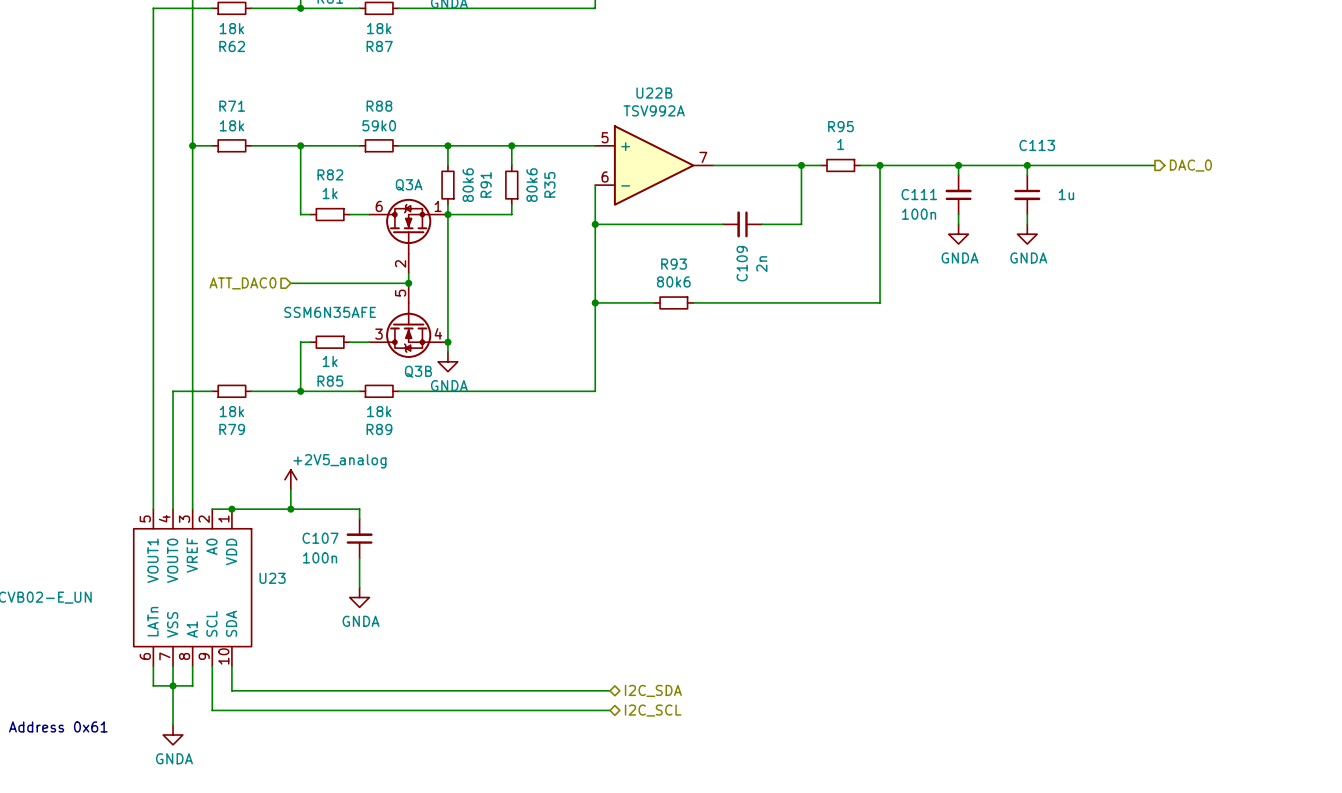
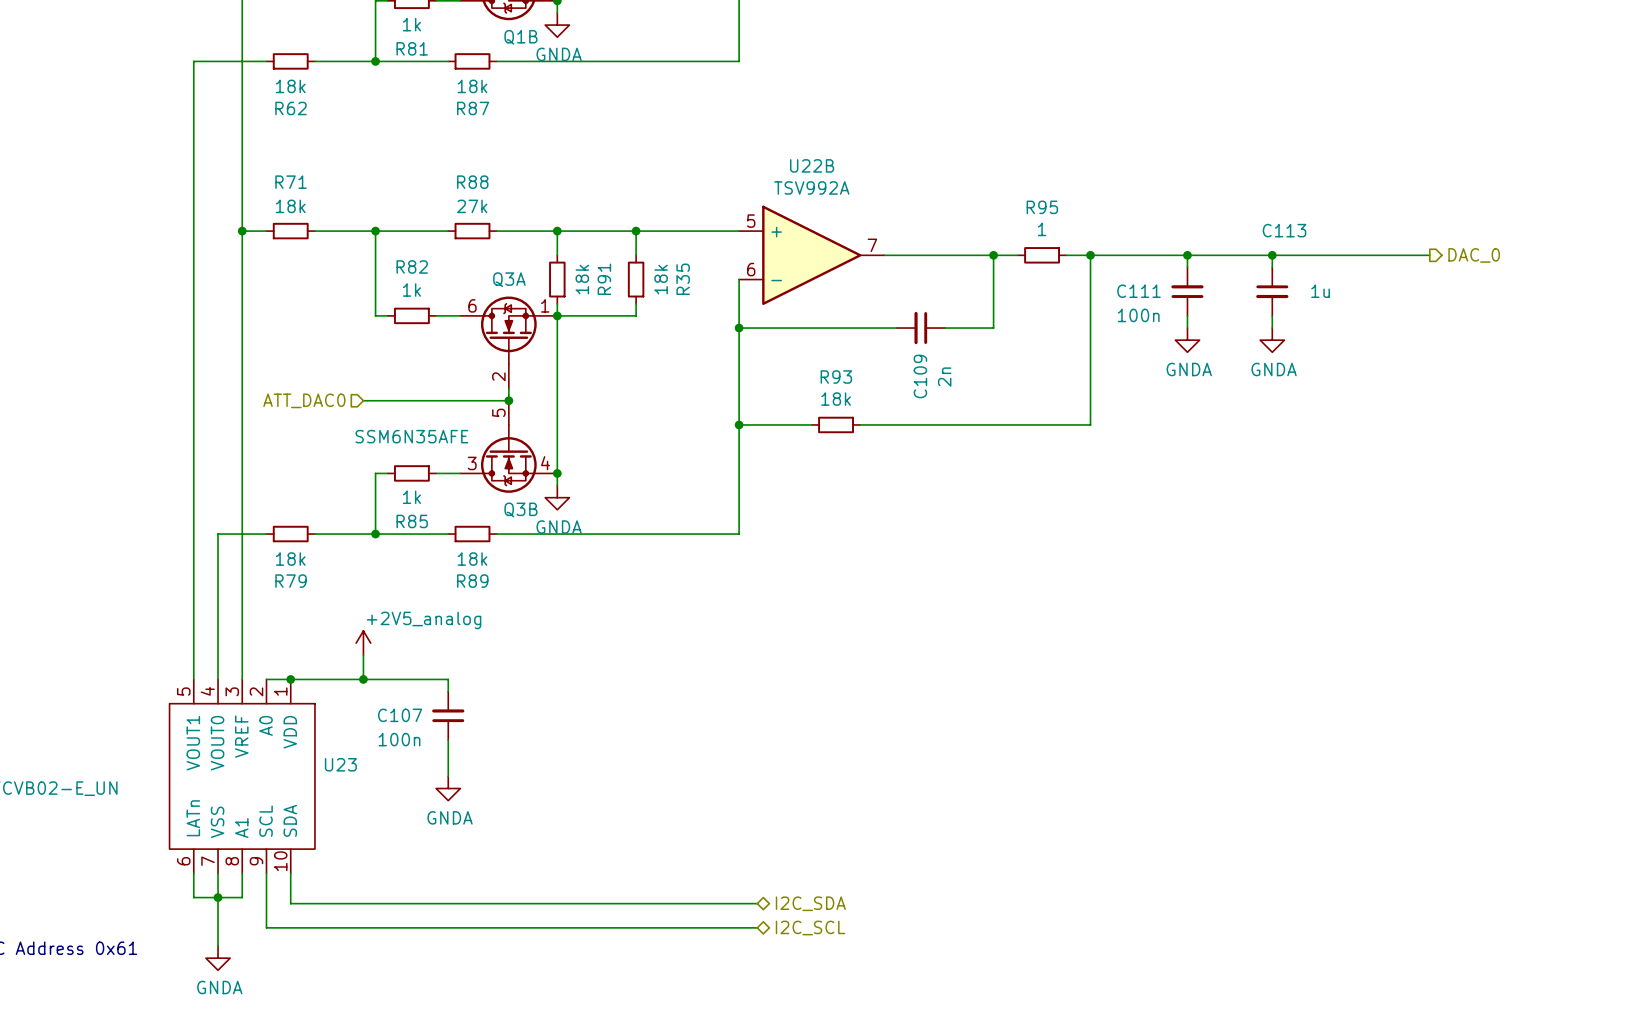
R88 value: 59k0 (379, 125) -> 27k (472, 206)
R91 value: 80k6 (468, 185) -> 18k (582, 279)
R35 value: 80k6 (532, 185) -> 18k (661, 279)
R93 value: 80k6 (673, 281) -> 18k (836, 399)

